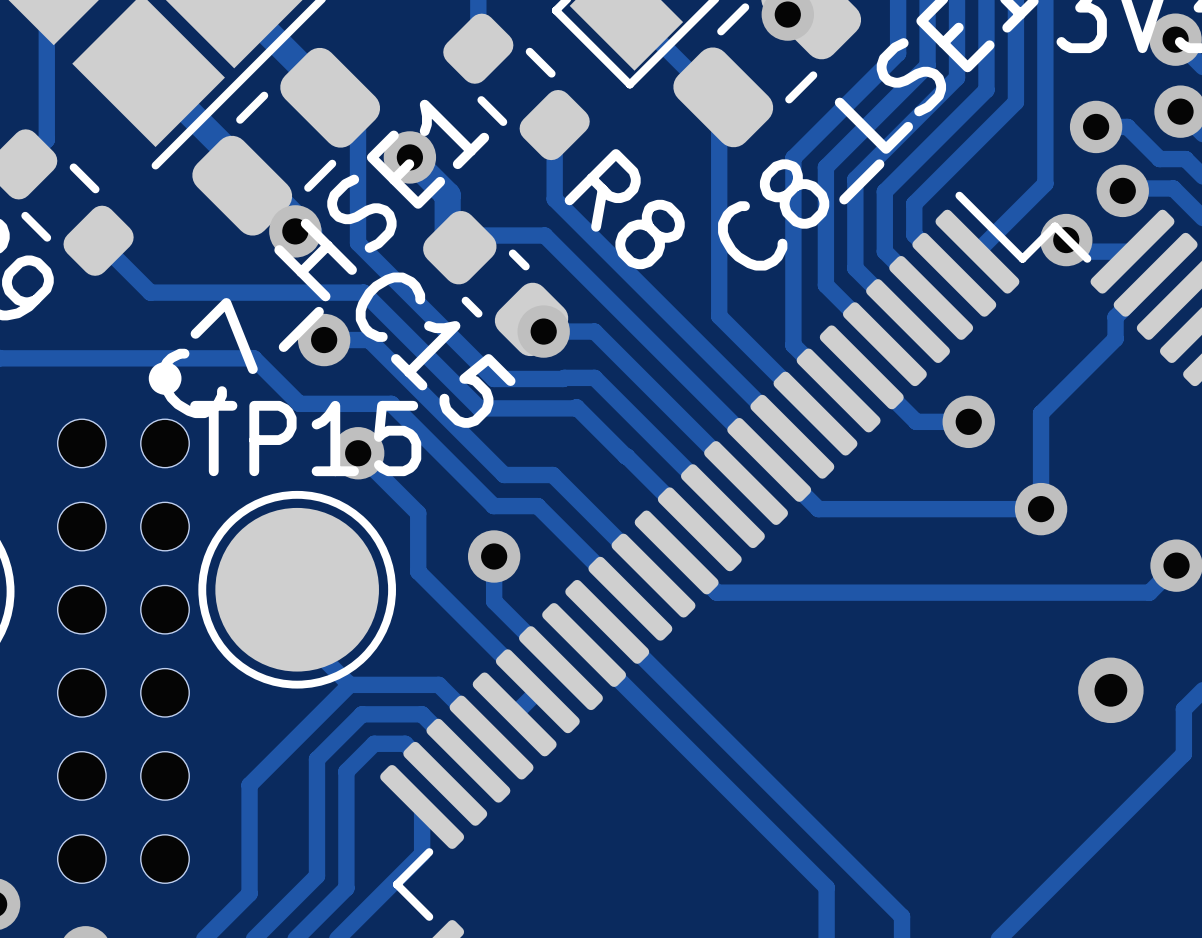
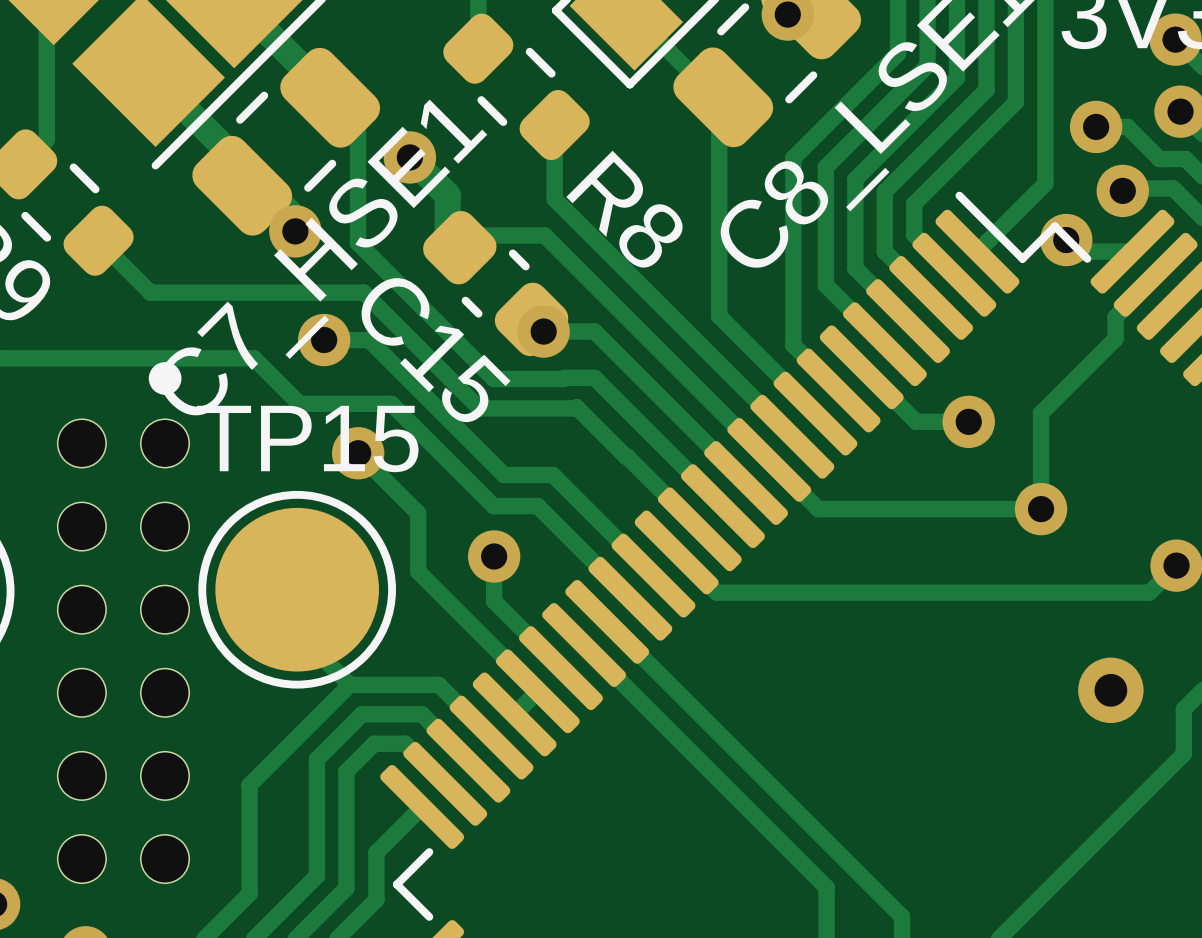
track: (422, 806) (422, 854) (376, 899) -> (422, 806) (376, 852) (376, 899)

